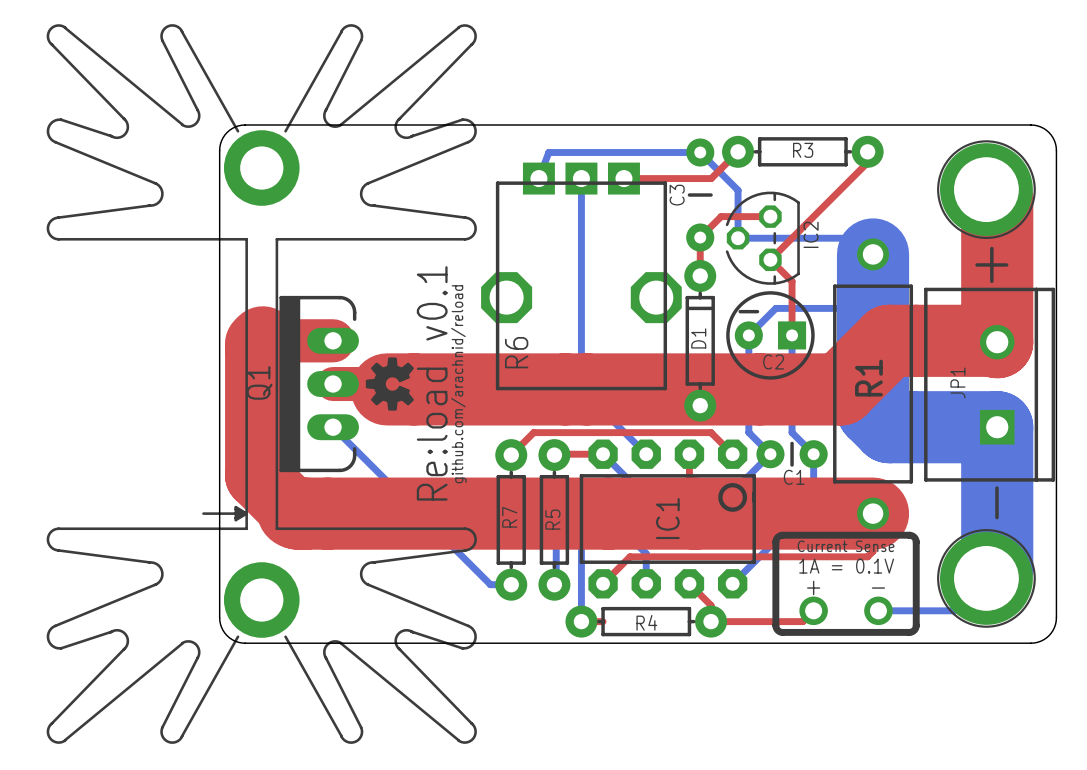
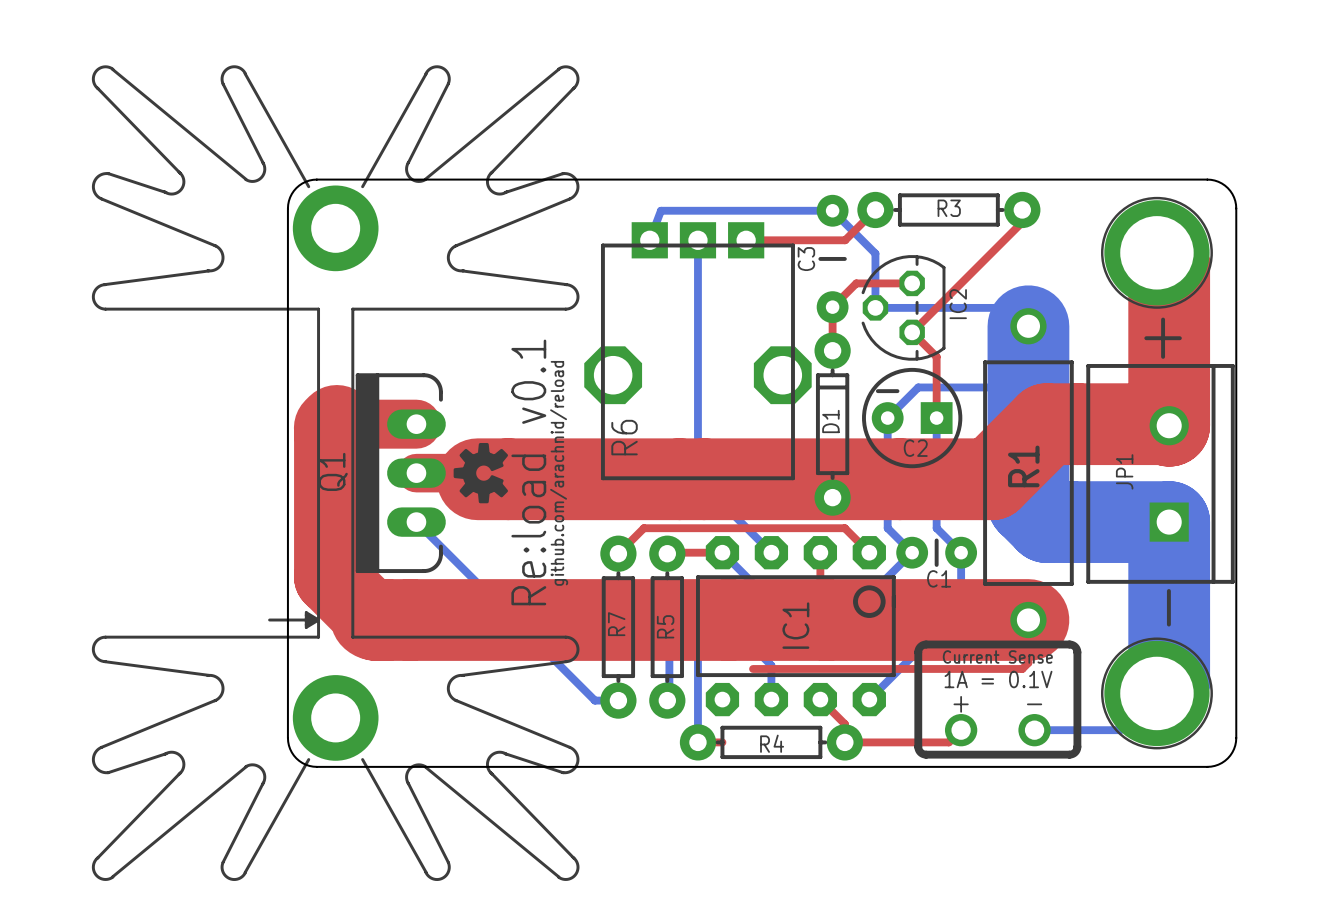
top track: (630, 556) (603, 583) -> none

